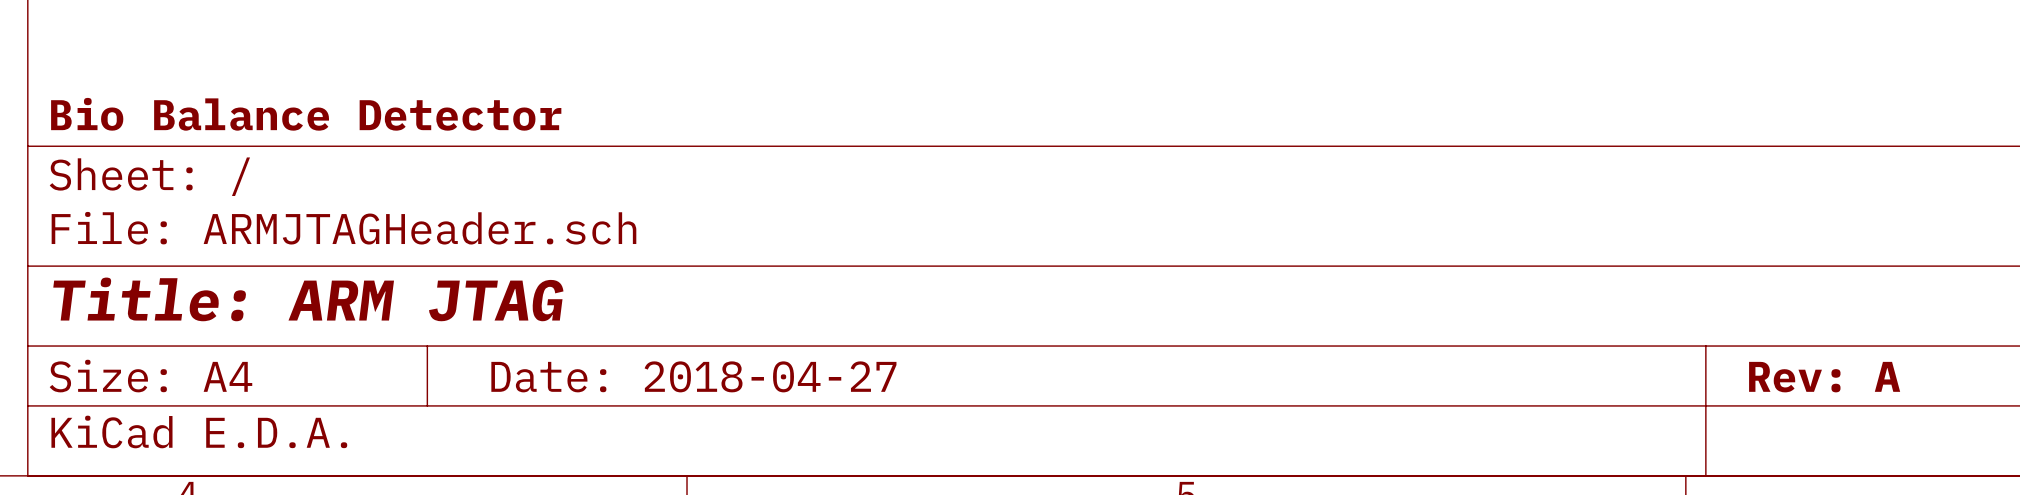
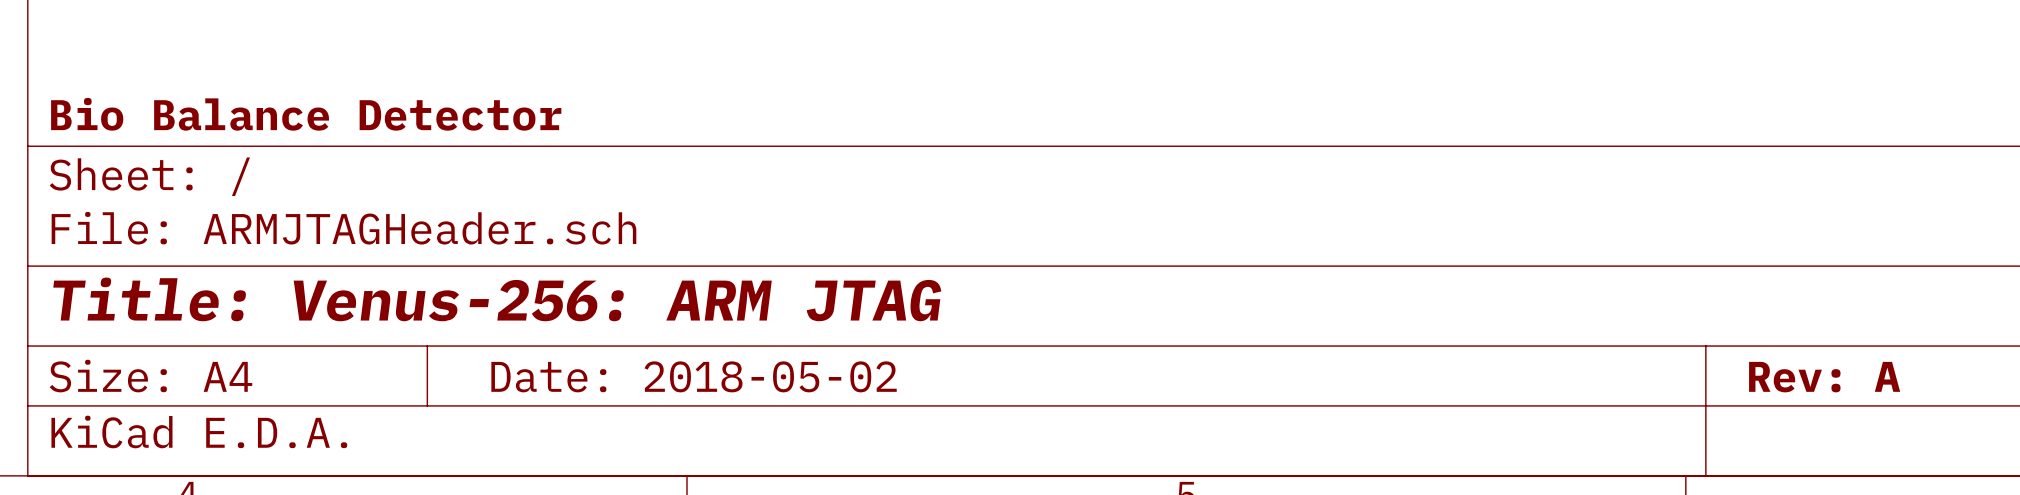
title block: Title: ARM JTAG (308, 299) -> Title: Venus-256: ARM JTAG (497, 299)
title block: Date: 2018-04-27 (693, 376) -> Date: 2018-05-02 (694, 376)

